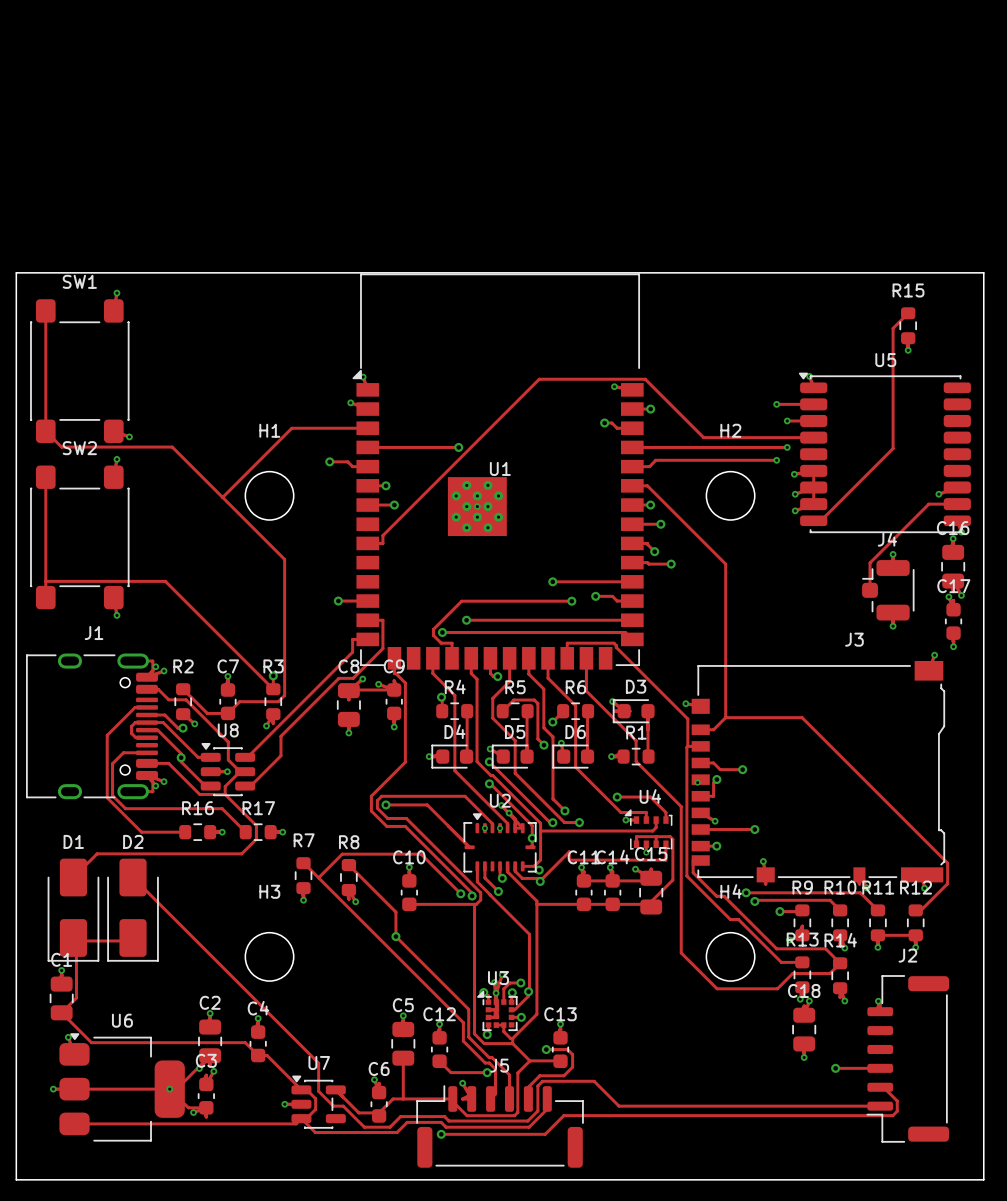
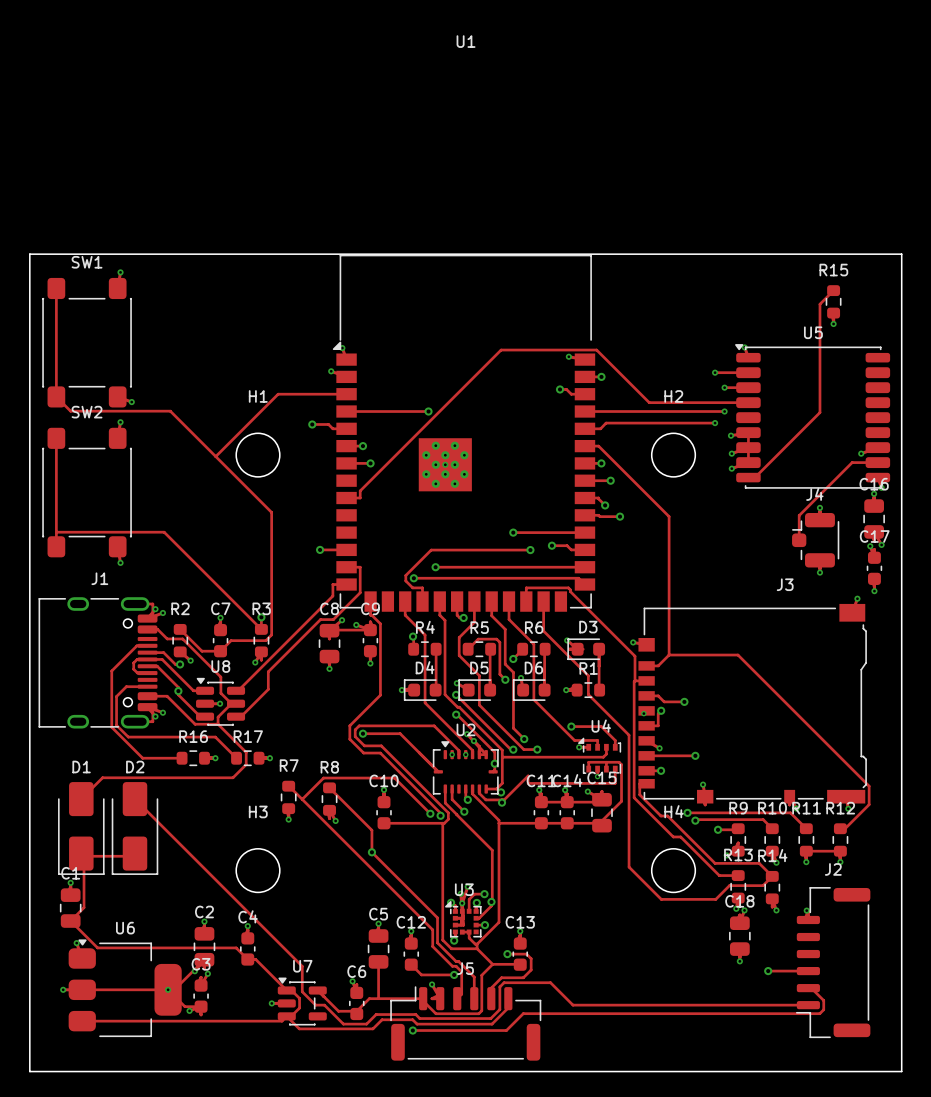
U1 name position: U1 (500, 468) -> U1 (466, 41)

